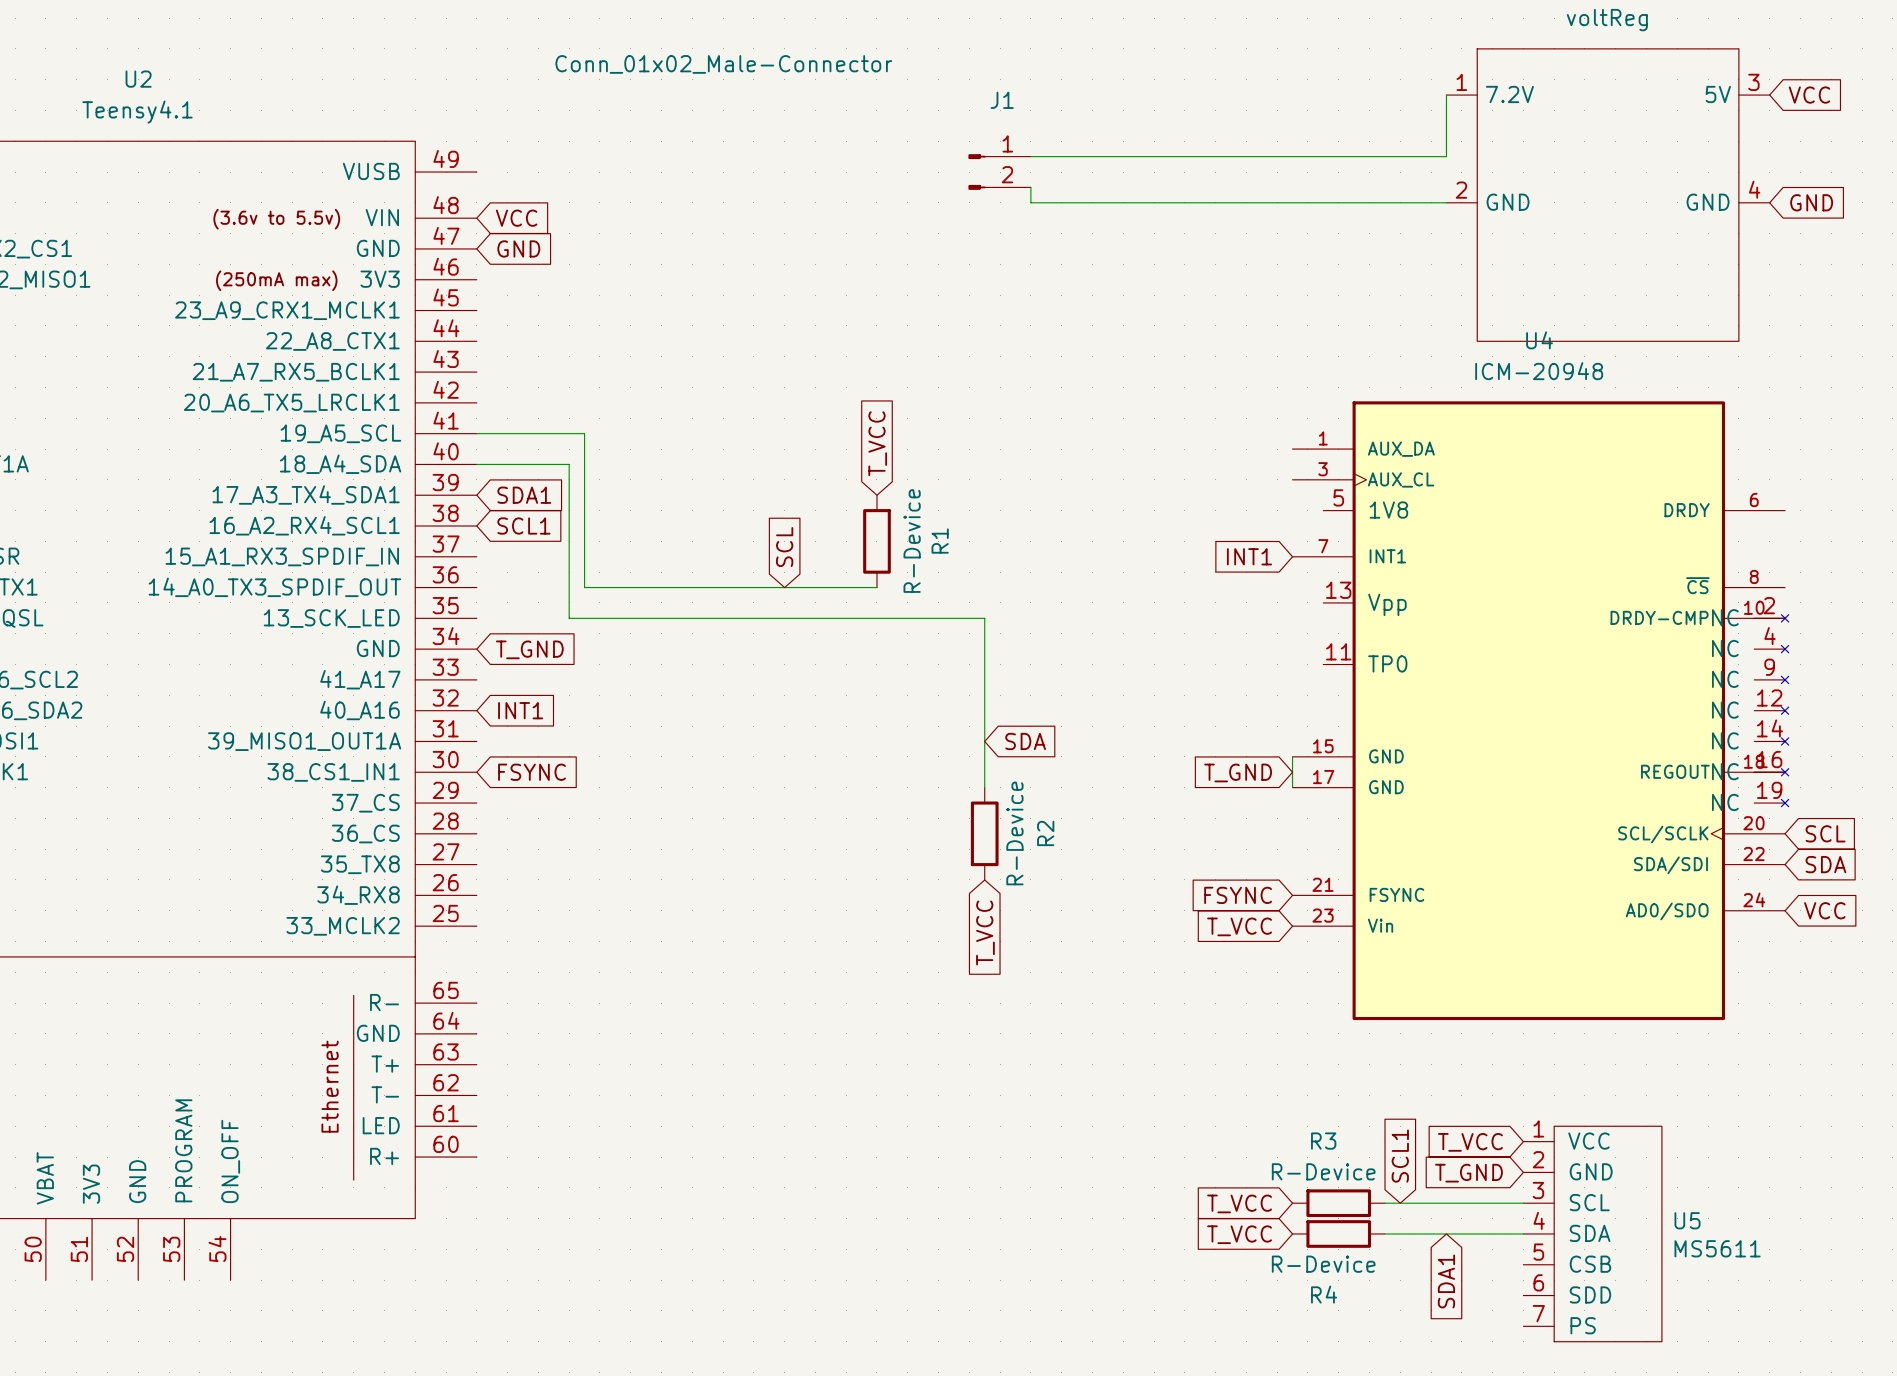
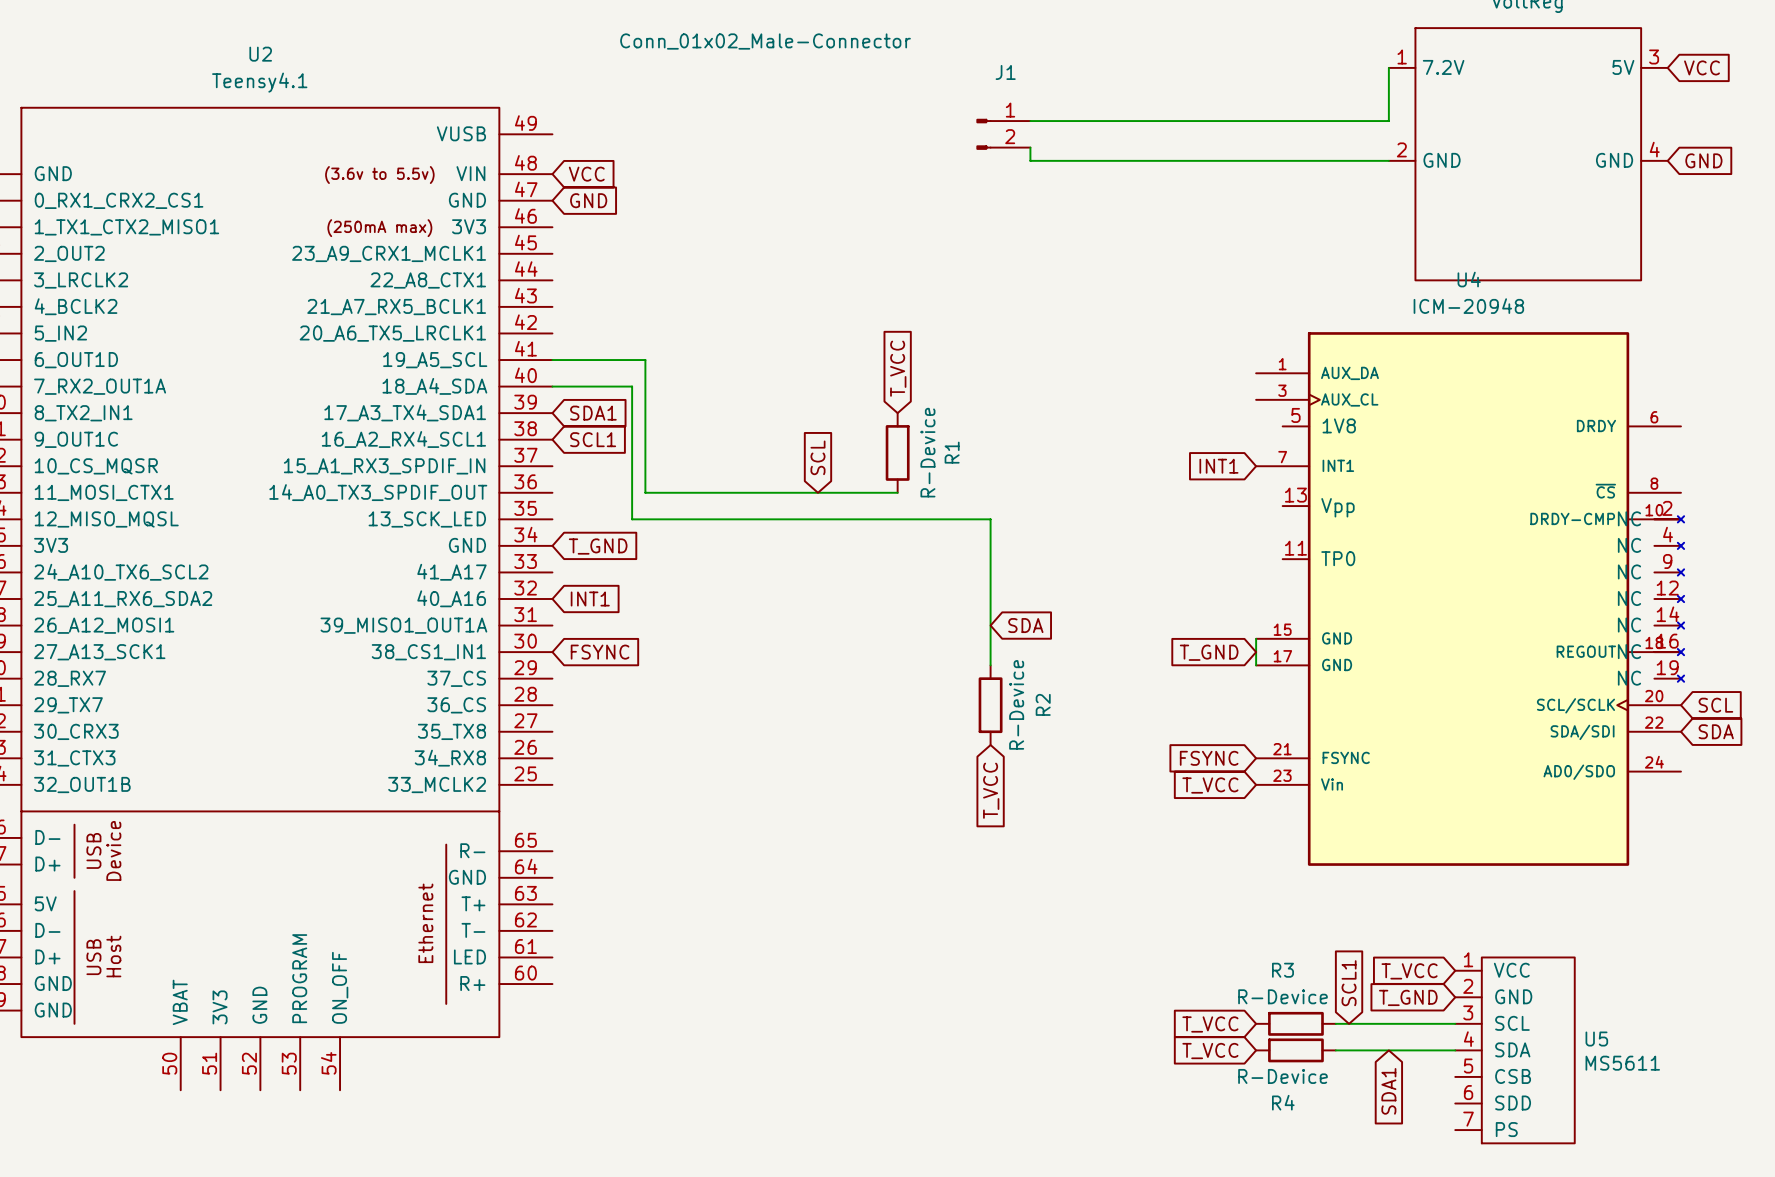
global label: VCC (1824, 910) -> none

